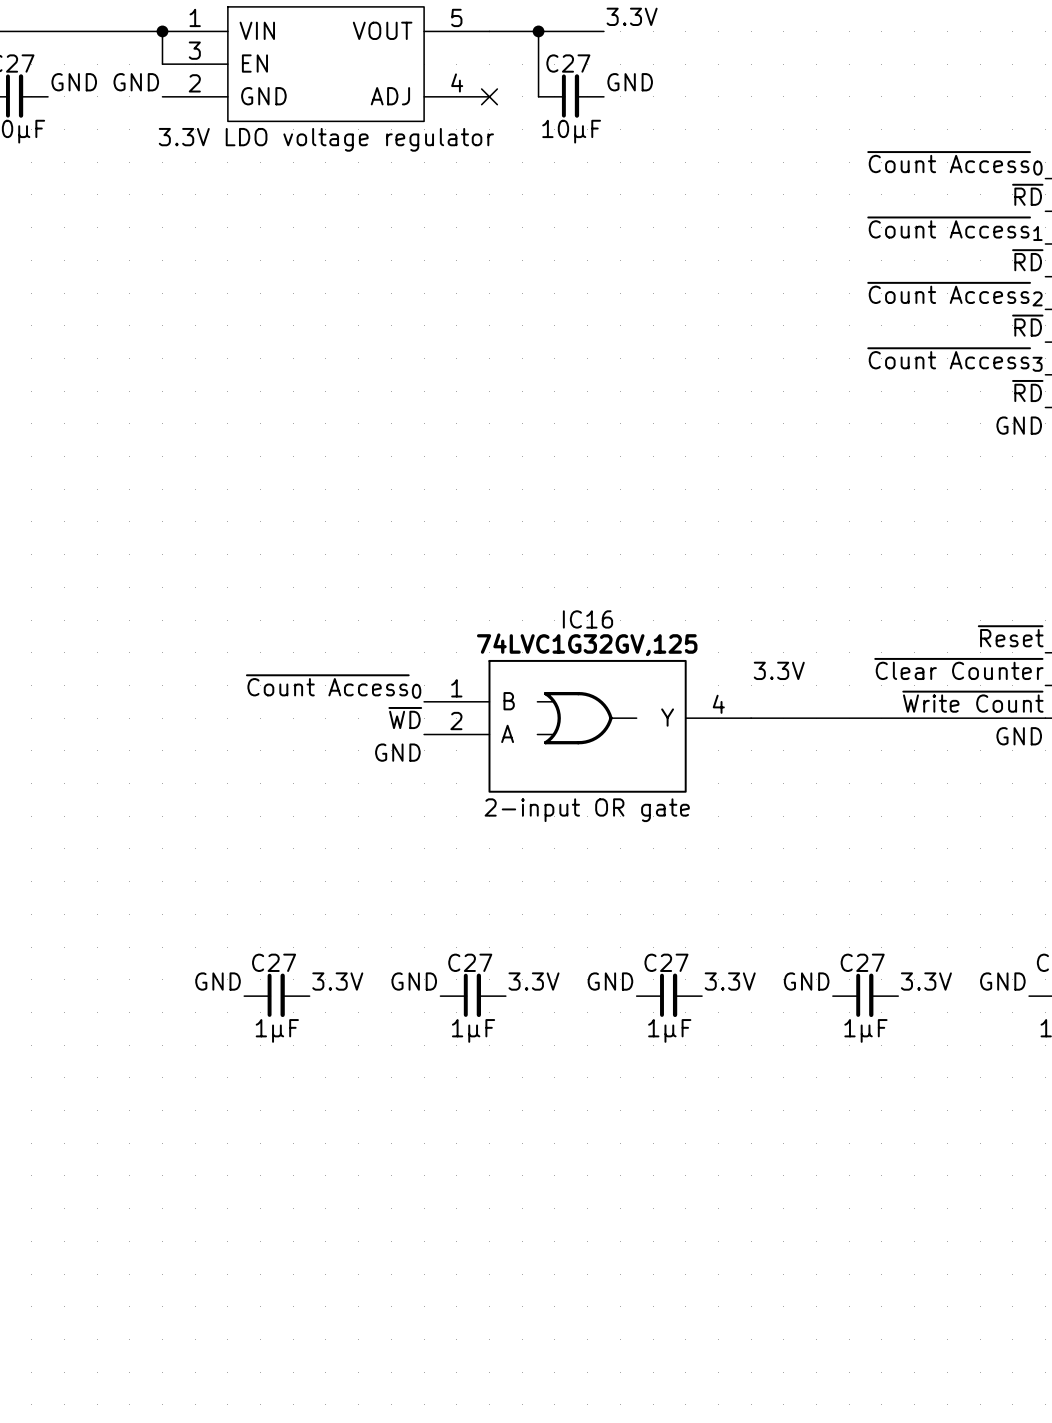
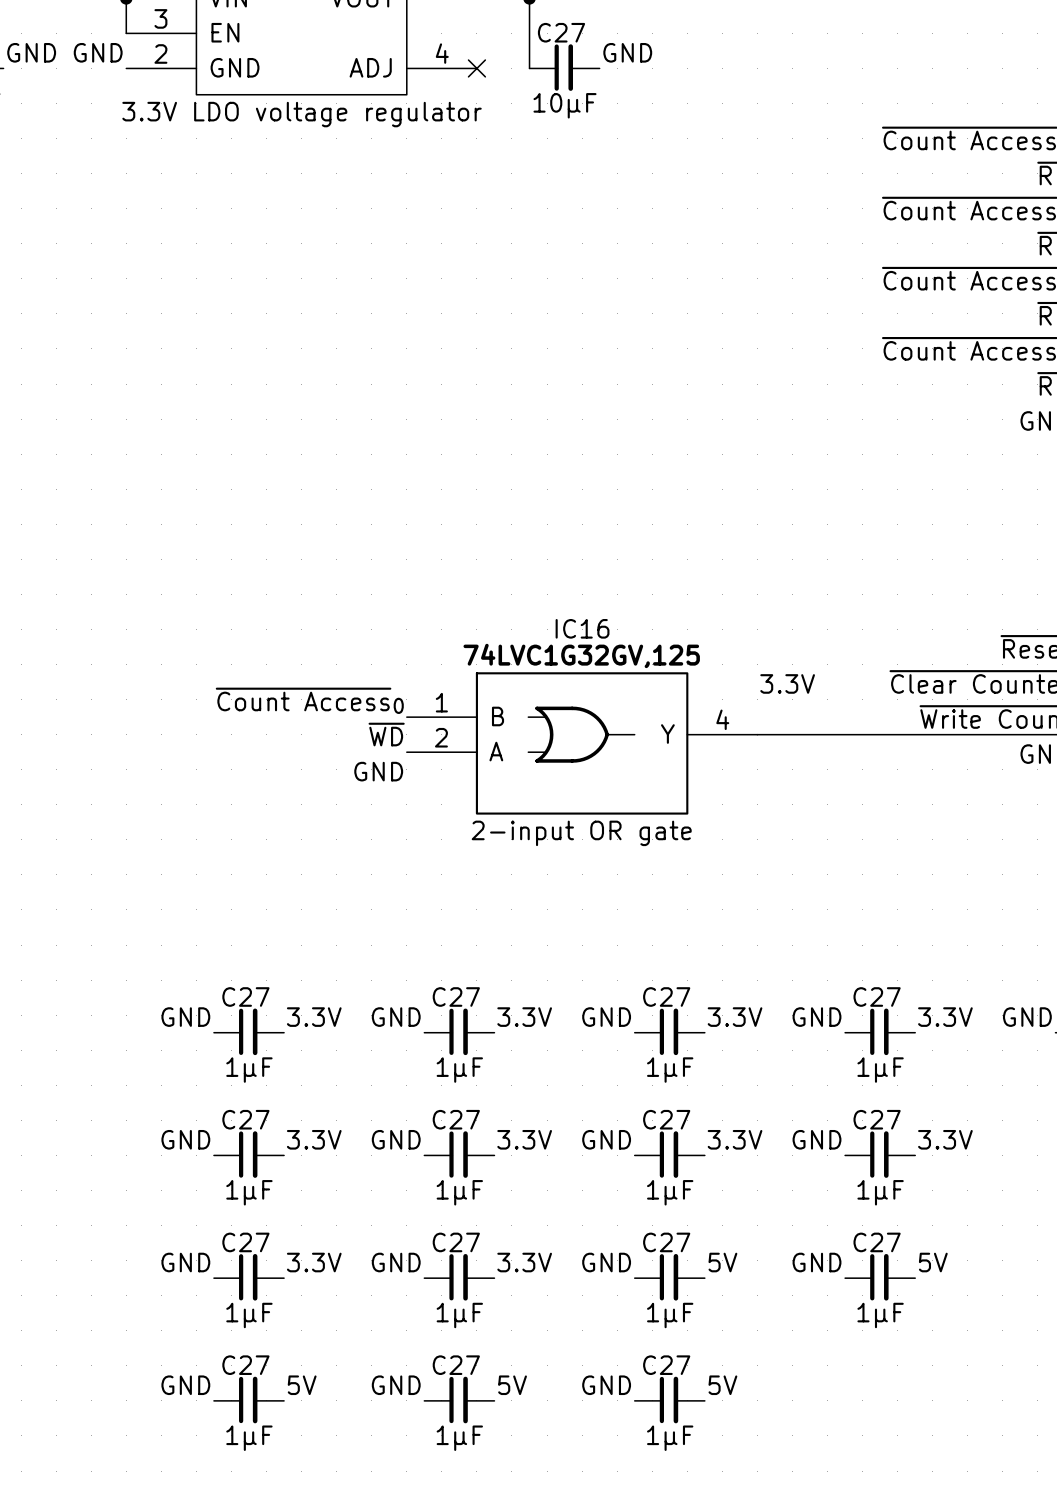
label: none -> GND (185, 1139)
label: none -> 3.3V (314, 1139)
label: none -> GND (396, 1139)
label: none -> 3.3V (524, 1139)
label: none -> GND (606, 1139)
label: none -> 3.3V (735, 1139)
label: none -> GND (817, 1139)
label: none -> 3.3V (945, 1139)
C27: none -> 1μF (249, 1154)
C27: none -> 1μF (459, 1154)
C27: none -> 1μF (669, 1154)
C27: none -> 1μF (880, 1154)
label: none -> GND (185, 1262)
label: none -> 3.3V (314, 1262)
label: none -> GND (396, 1262)
label: none -> 3.3V (524, 1262)
label: none -> GND (606, 1262)
label: none -> 5V (722, 1262)
label: none -> GND (817, 1262)
label: none -> 5V (933, 1262)
C27: none -> 1μF (249, 1277)
C27: none -> 1μF (459, 1277)
C27: none -> 1μF (669, 1277)
C27: none -> 1μF (880, 1277)
label: none -> GND (185, 1385)
label: none -> 5V (302, 1385)
label: none -> GND (396, 1385)
label: none -> 5V (512, 1385)
label: none -> GND (606, 1385)
label: none -> 5V (722, 1385)
C27: none -> 1μF (249, 1400)
C27: none -> 1μF (459, 1400)
C27: none -> 1μF (669, 1400)

